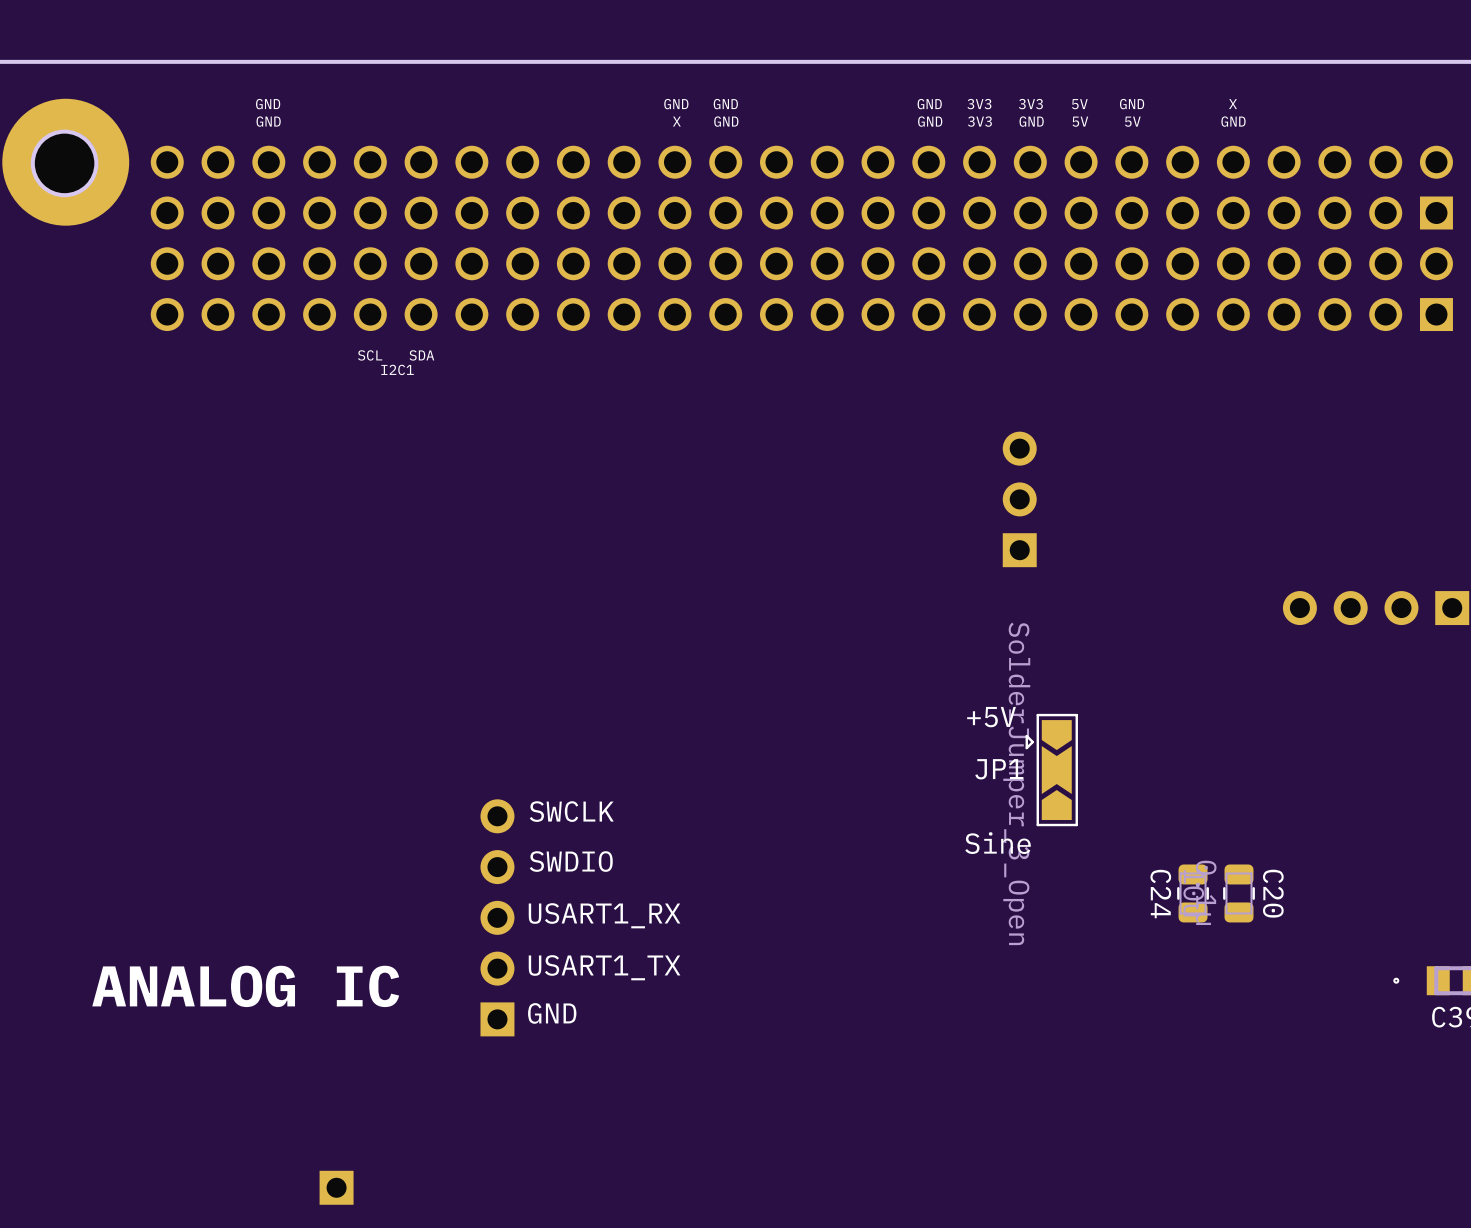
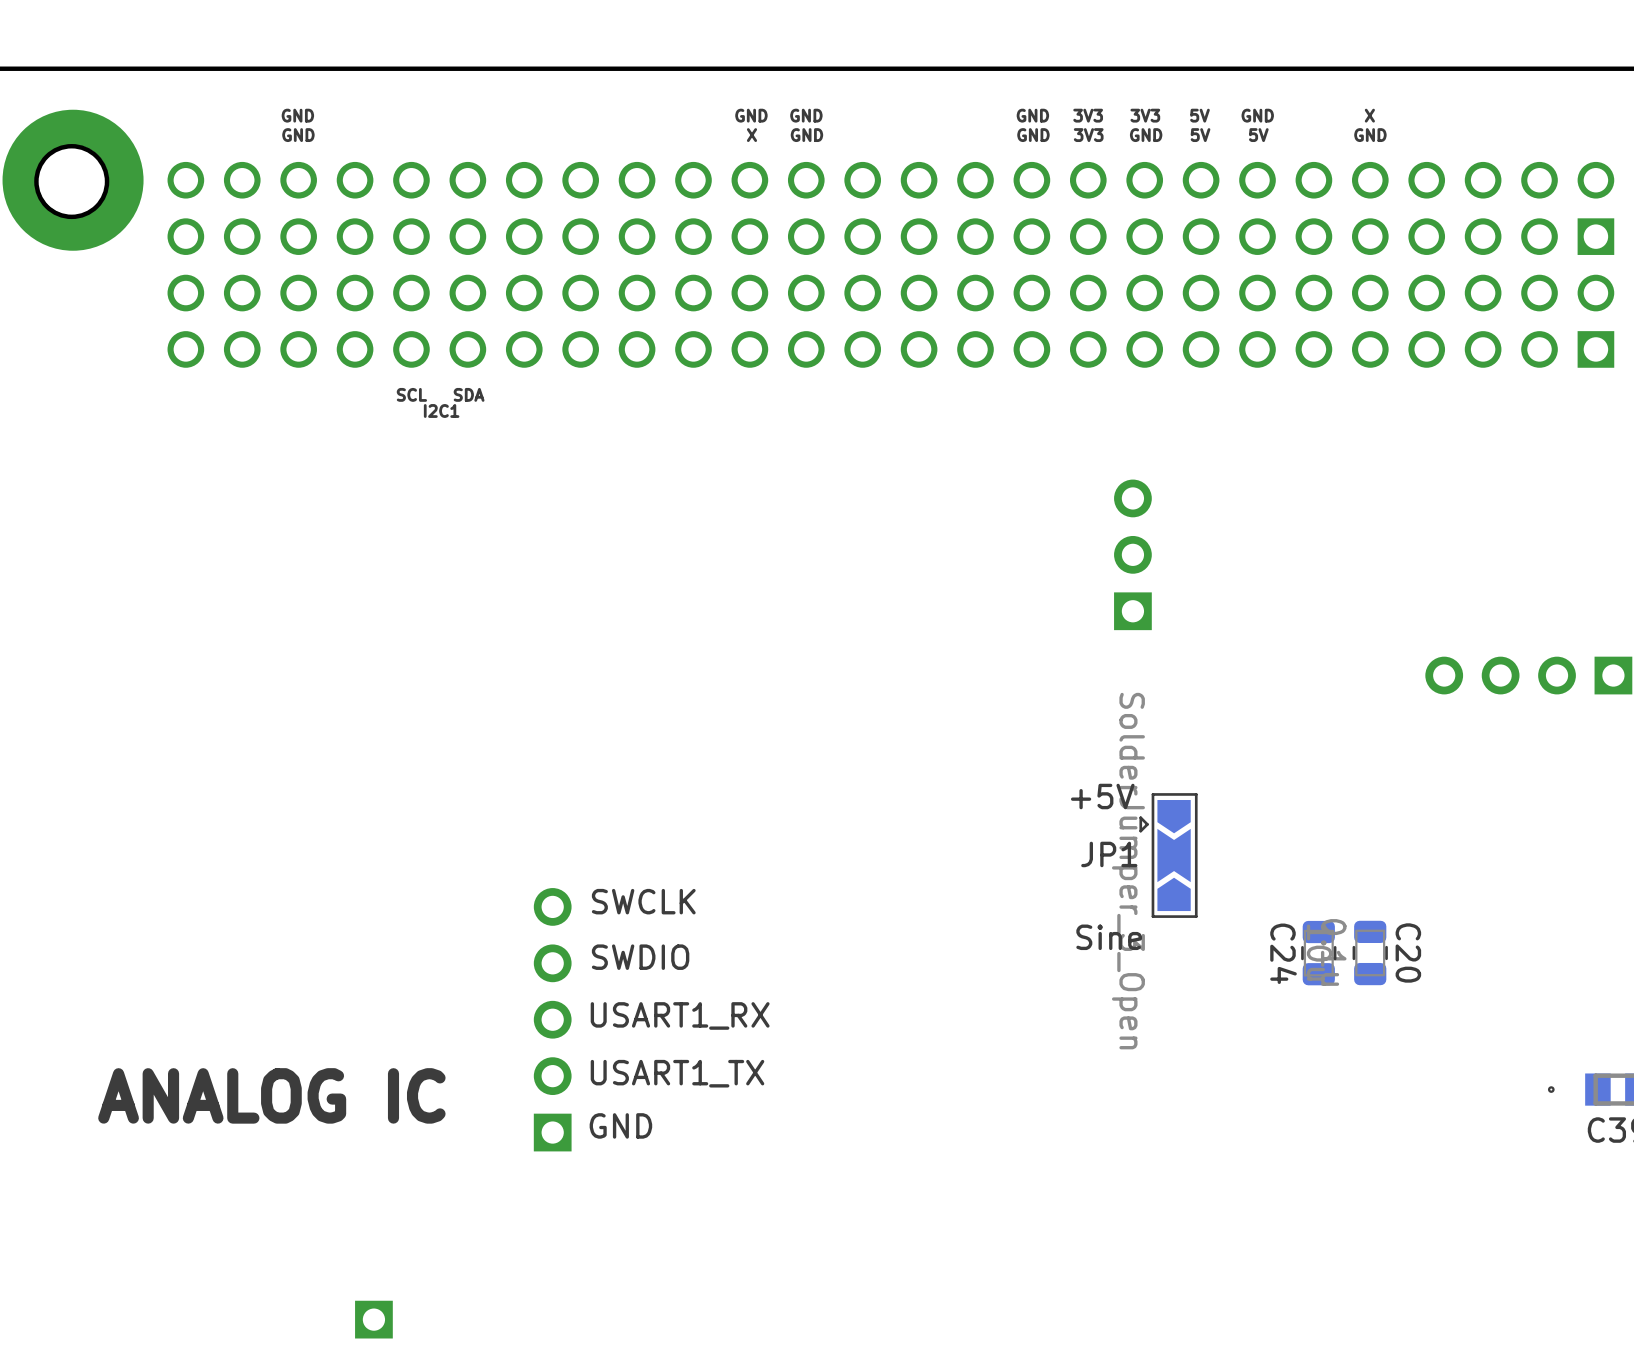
C24 position: (1193, 893) -> (1318, 953)
C20 position: (1239, 893) -> (1370, 952)

